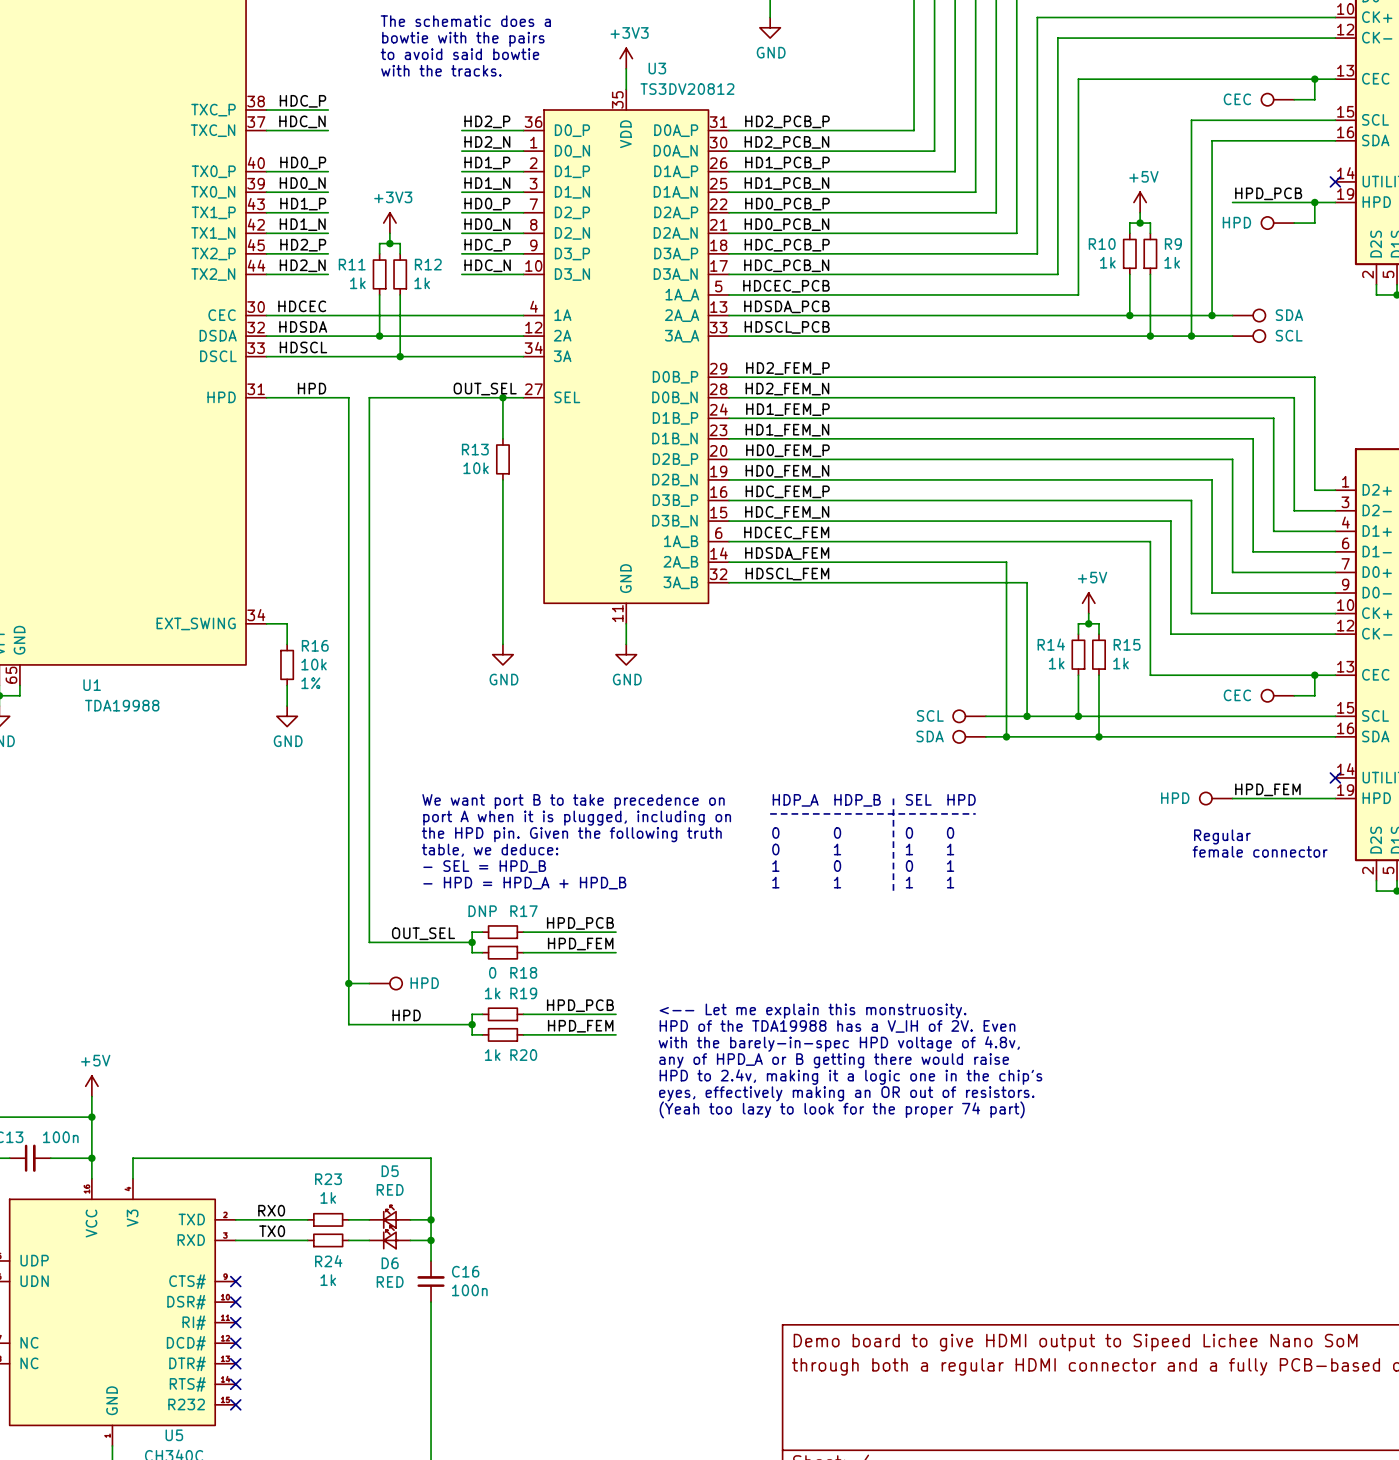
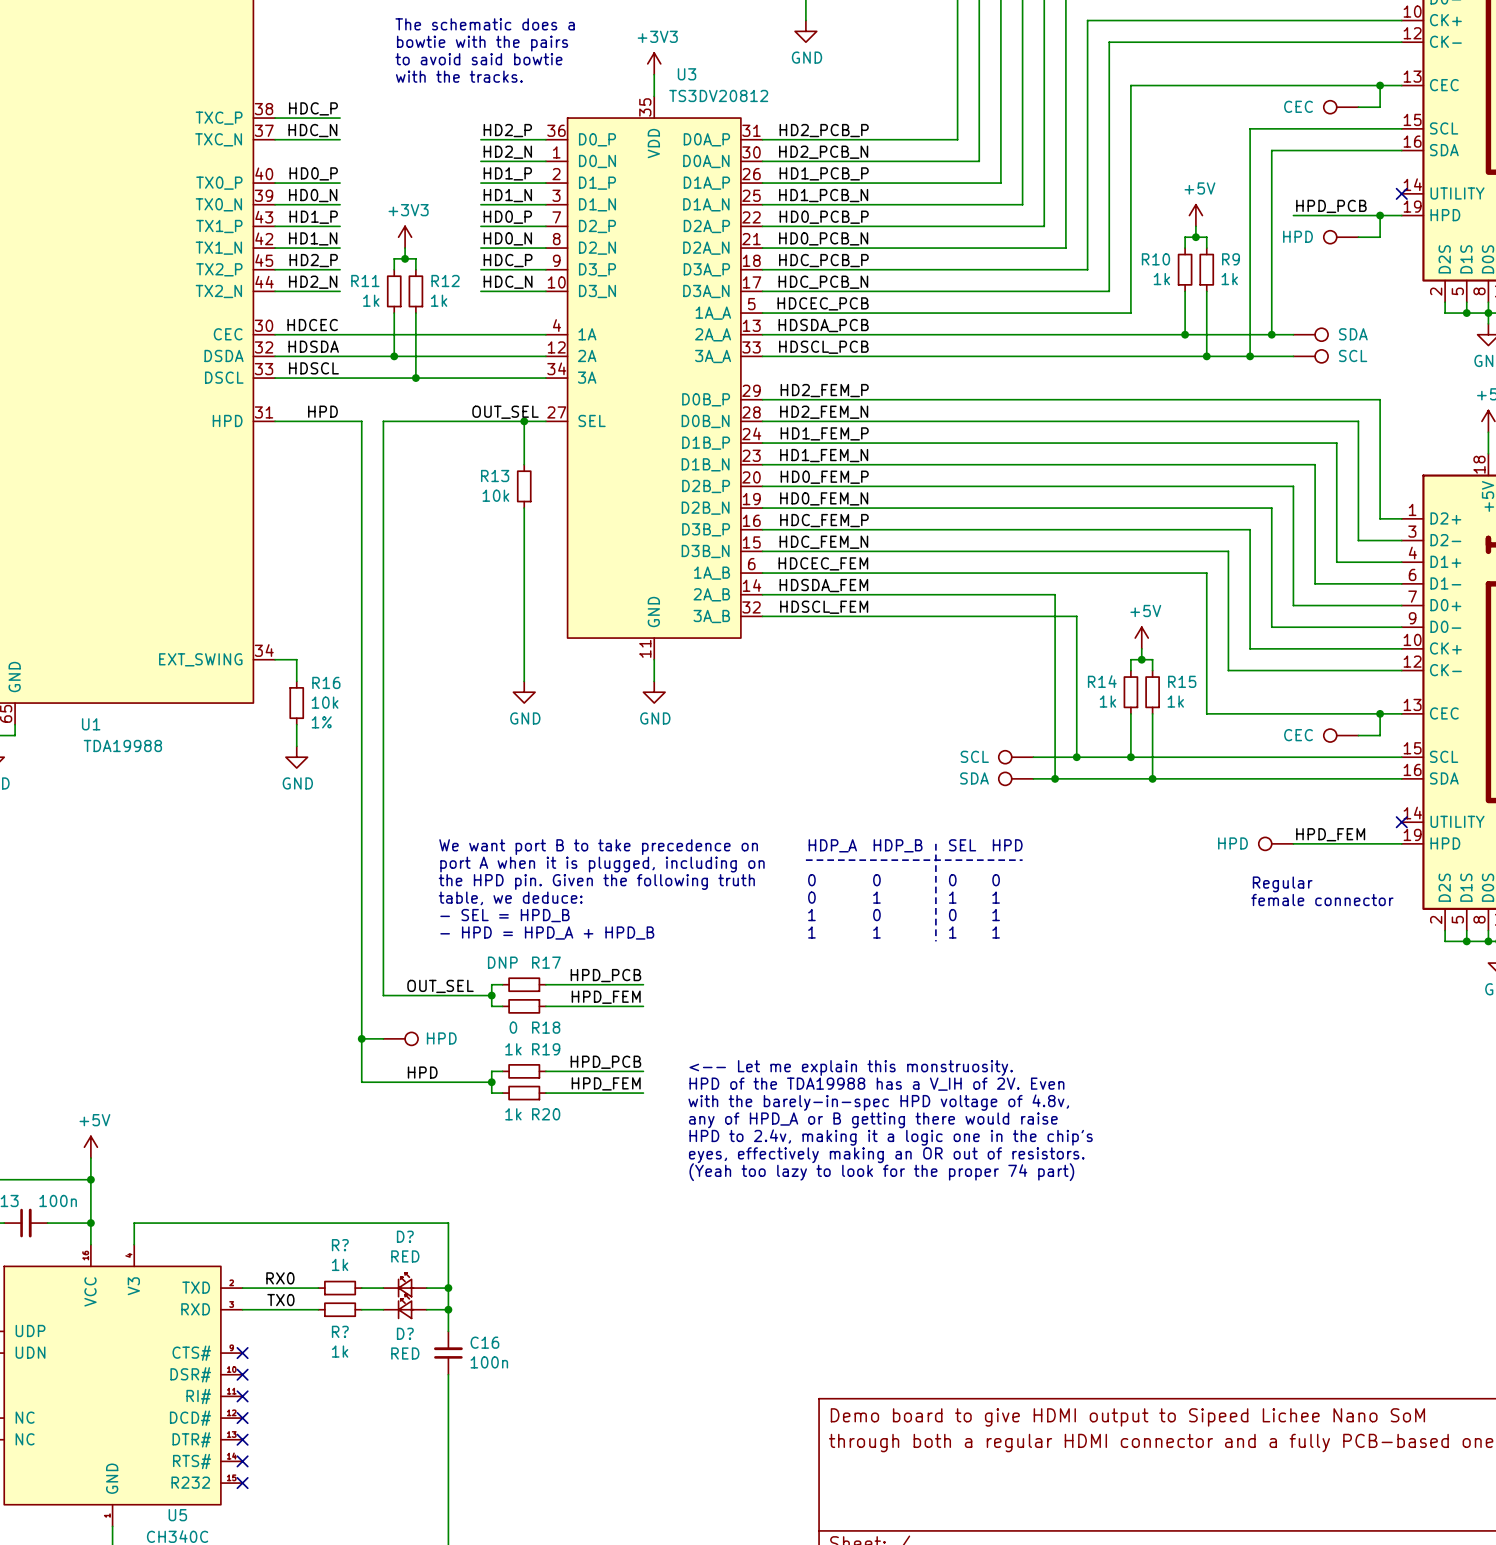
D5 name: D5 (390, 1171) -> D? (405, 1236)
R23 name: R23 (328, 1179) -> R? (340, 1245)
R24 name: R24 (328, 1261) -> R? (340, 1331)
D6 name: D6 (390, 1263) -> D? (405, 1333)

